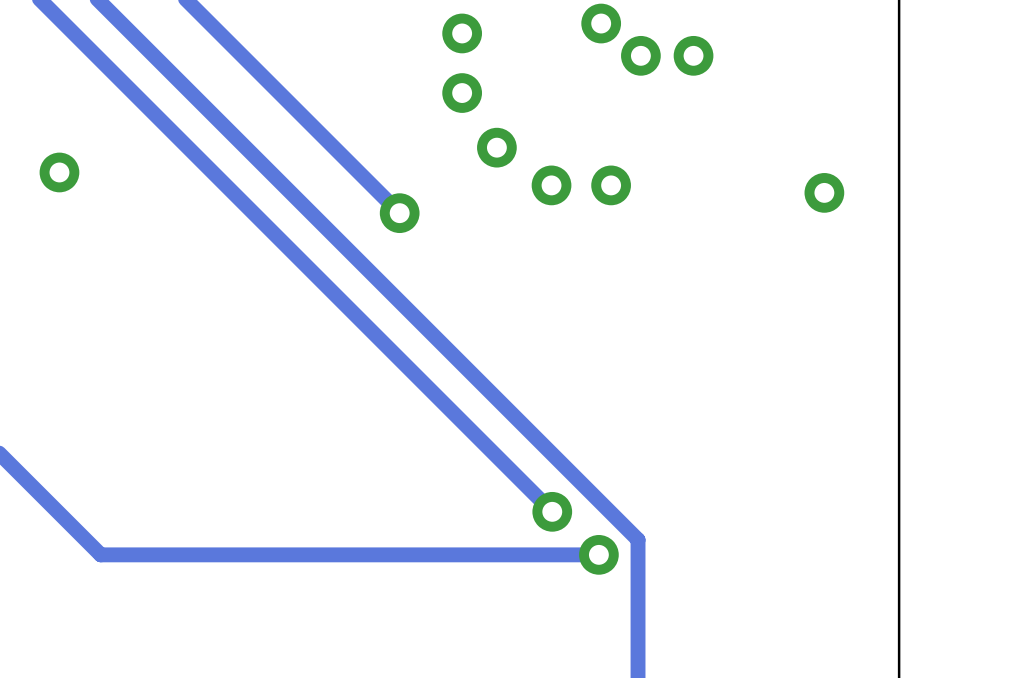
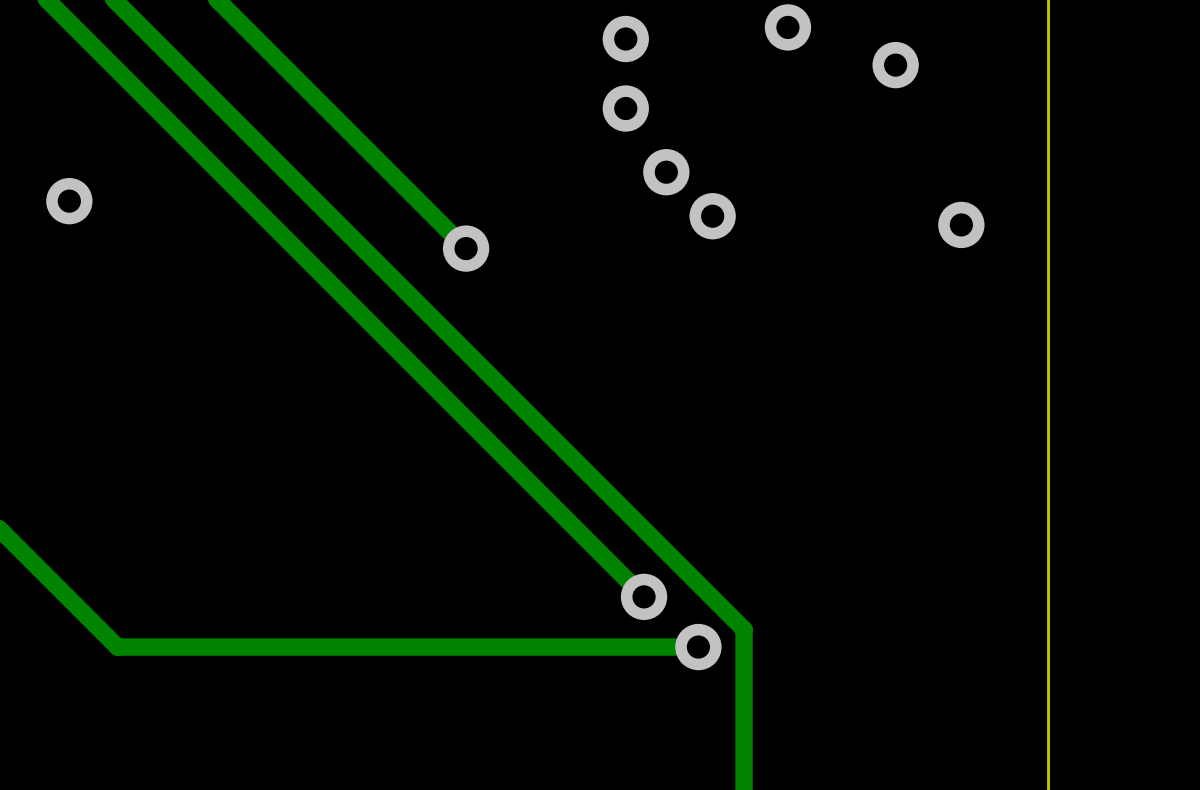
via: (601, 23) -> none
via: none -> (787, 27)
via: (462, 33) -> none
via: none -> (625, 39)
via: (640, 55) -> none
via: (693, 55) -> none
via: none -> (895, 65)
via: (462, 93) -> none
via: none -> (625, 108)
via: (496, 147) -> none
via position: (551, 185) -> (666, 172)

